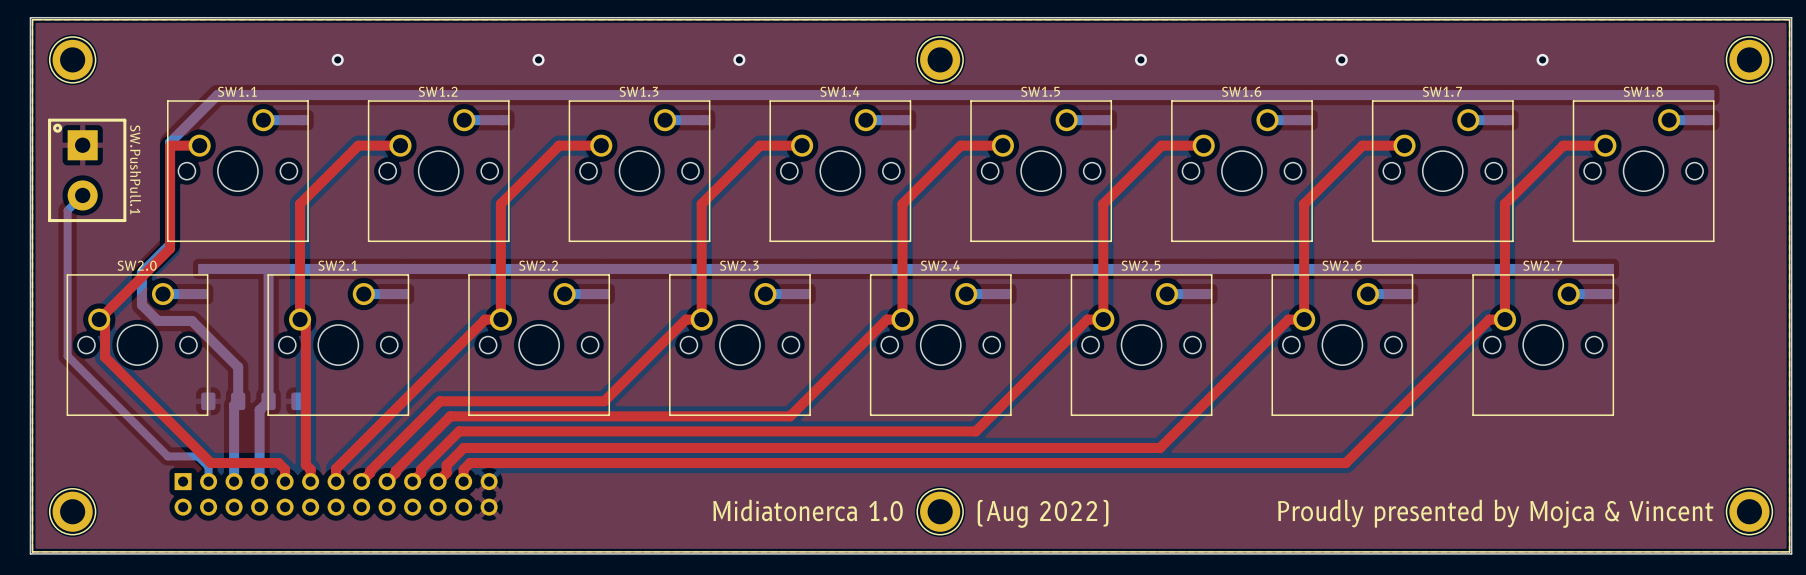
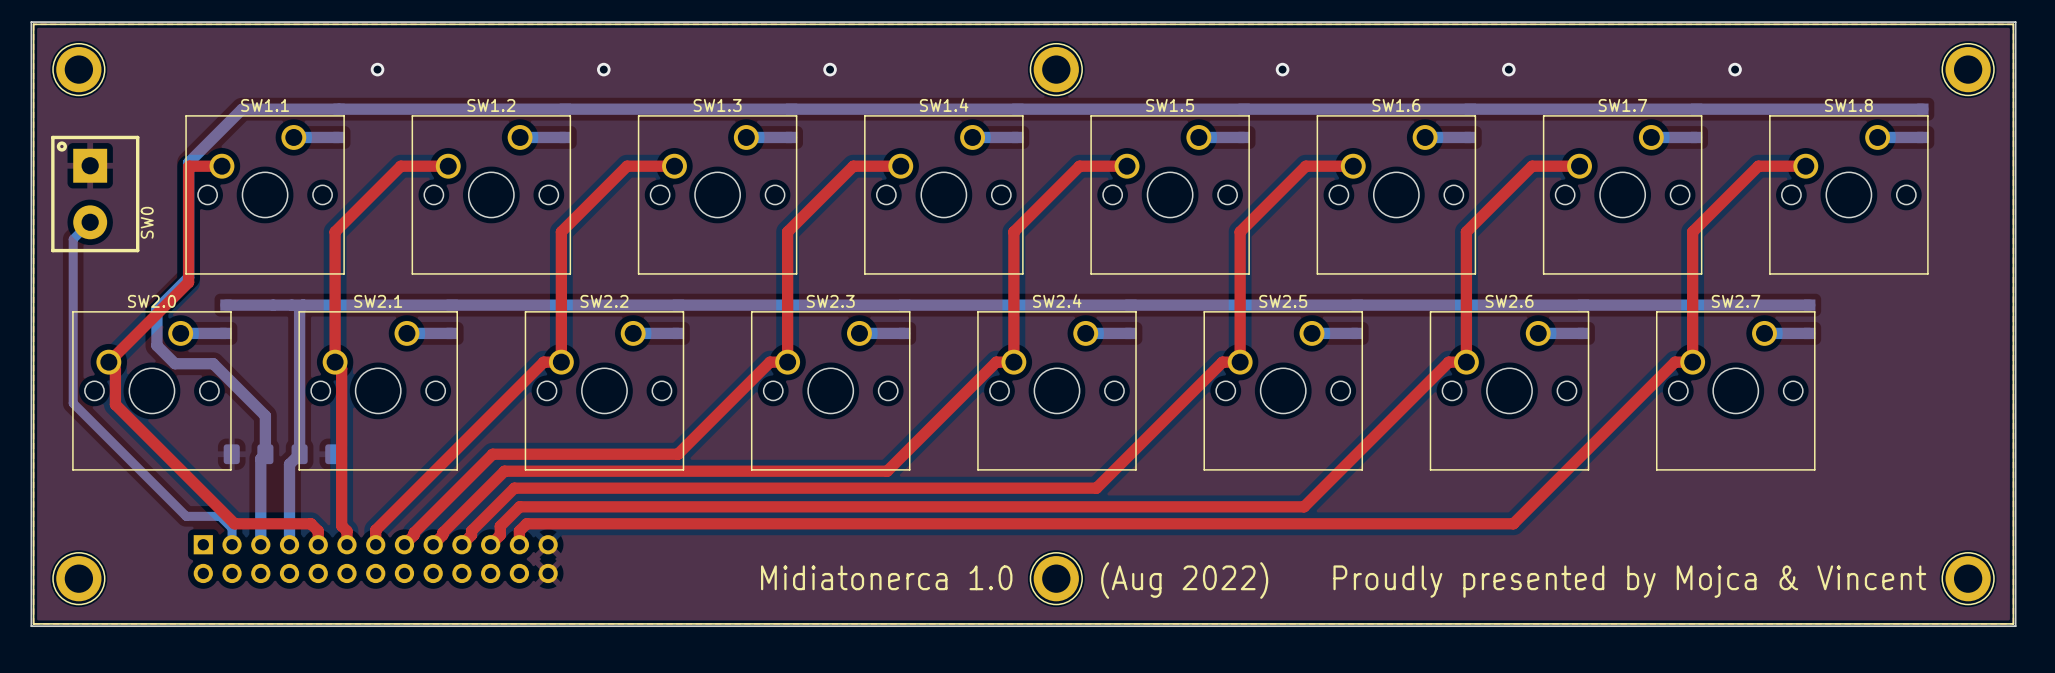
SW.PushPull.1 name: SW.PushPull.1 (135, 169) -> SW0 (147, 222)

